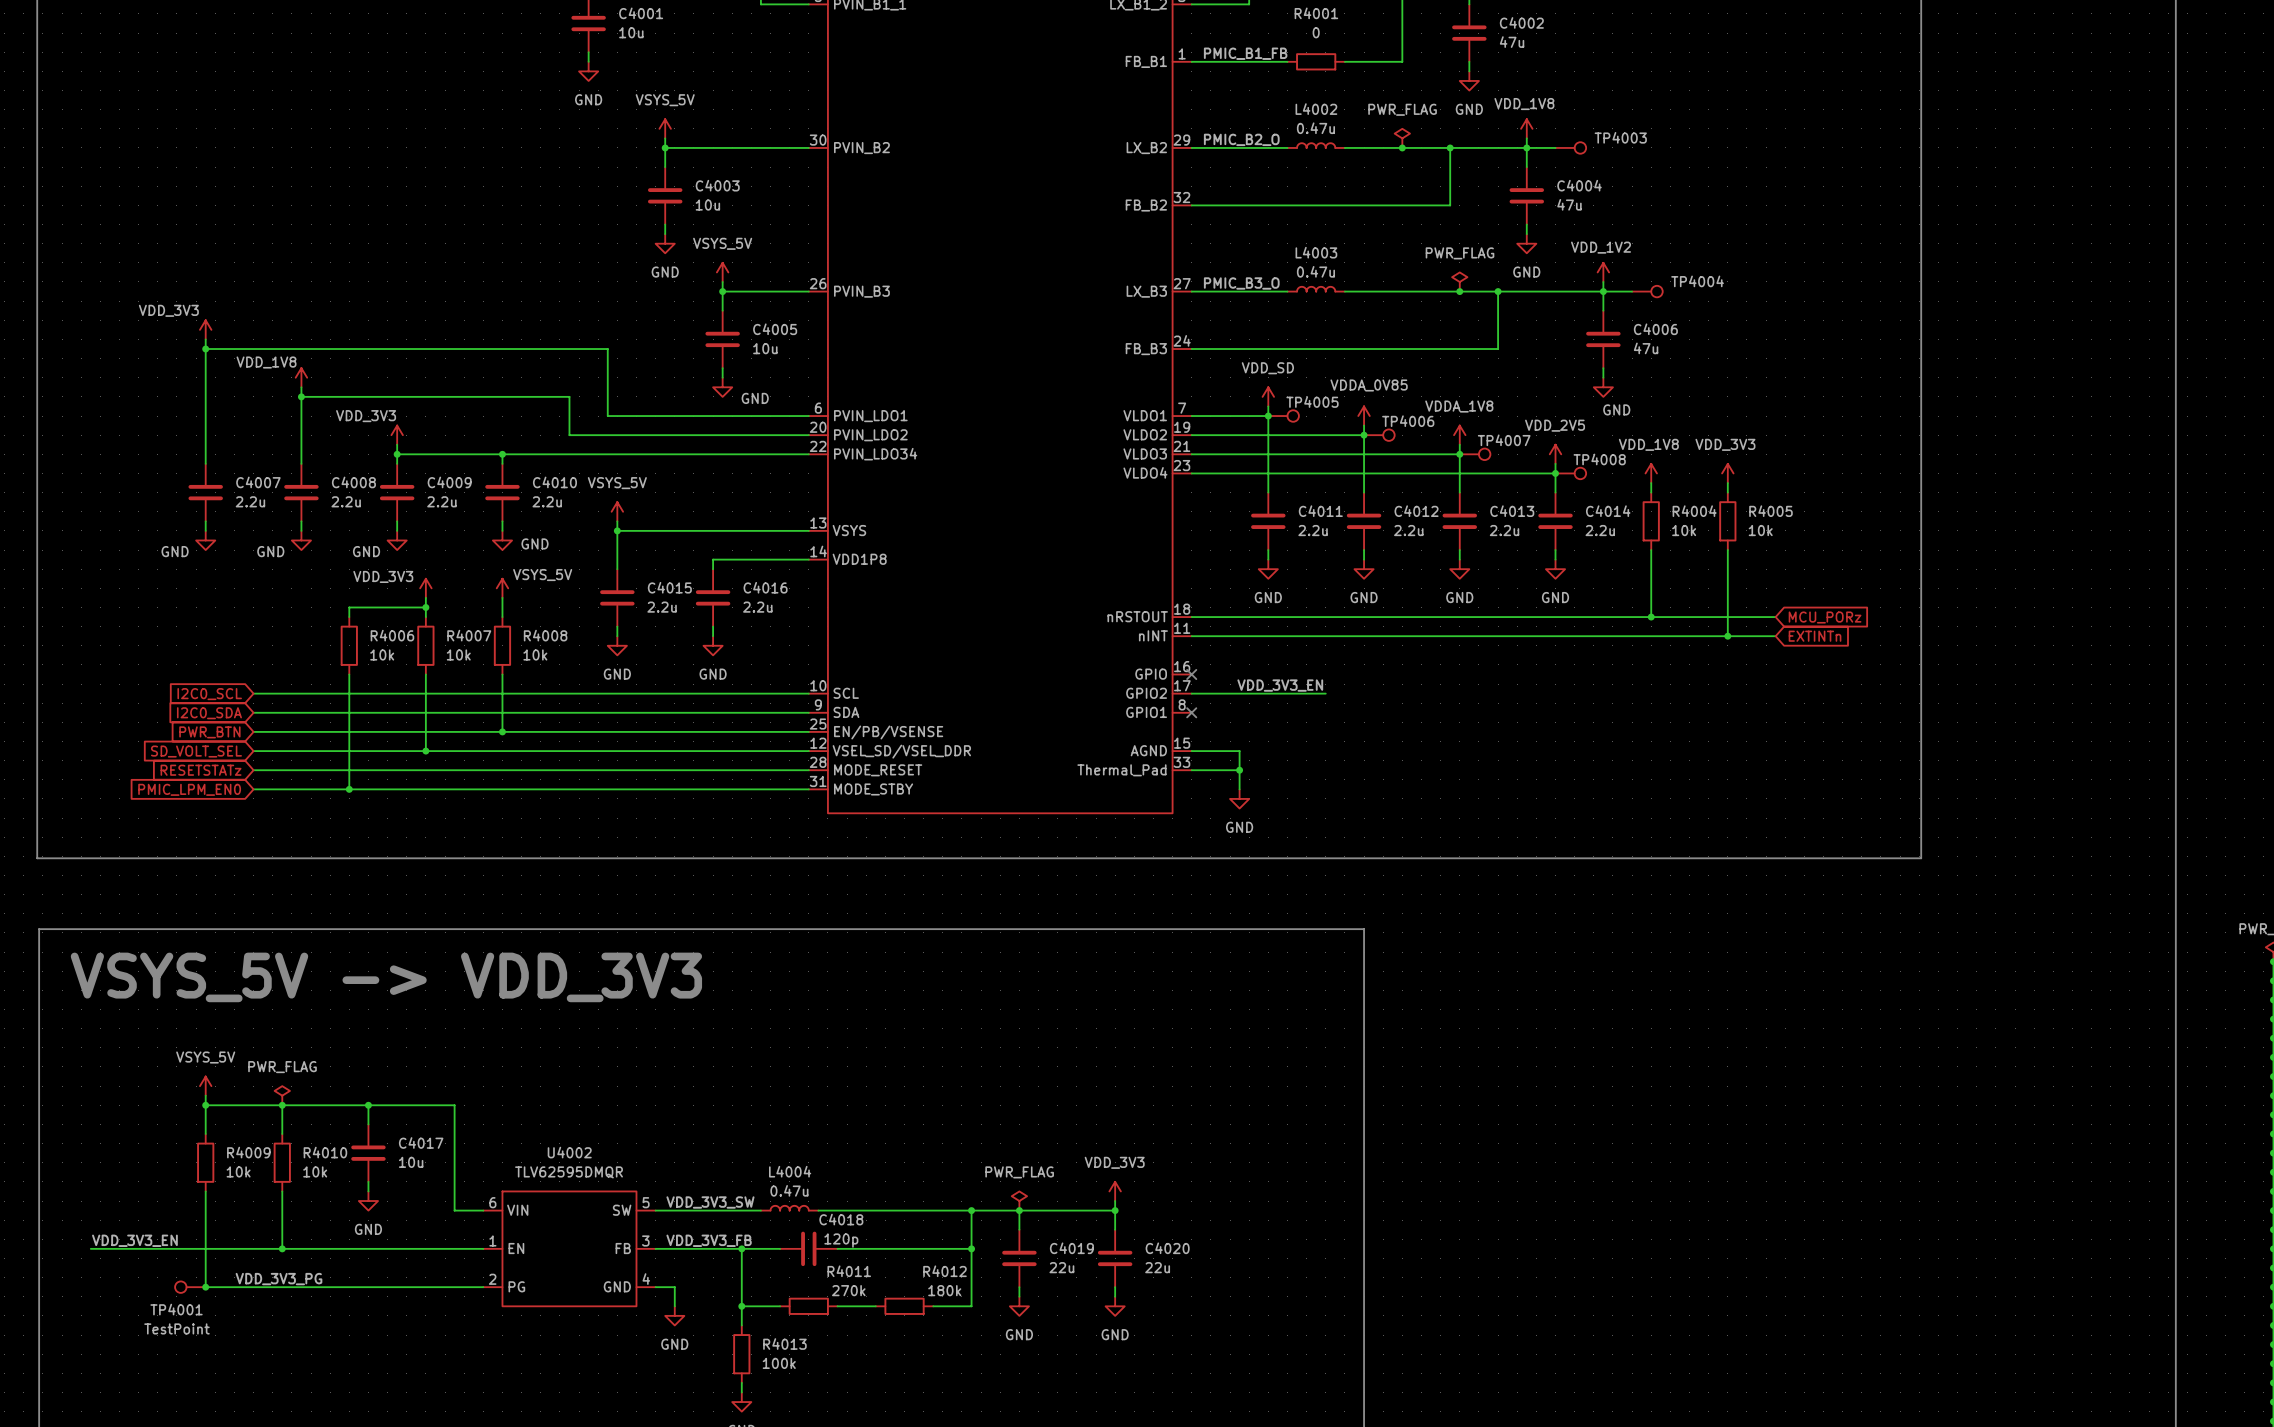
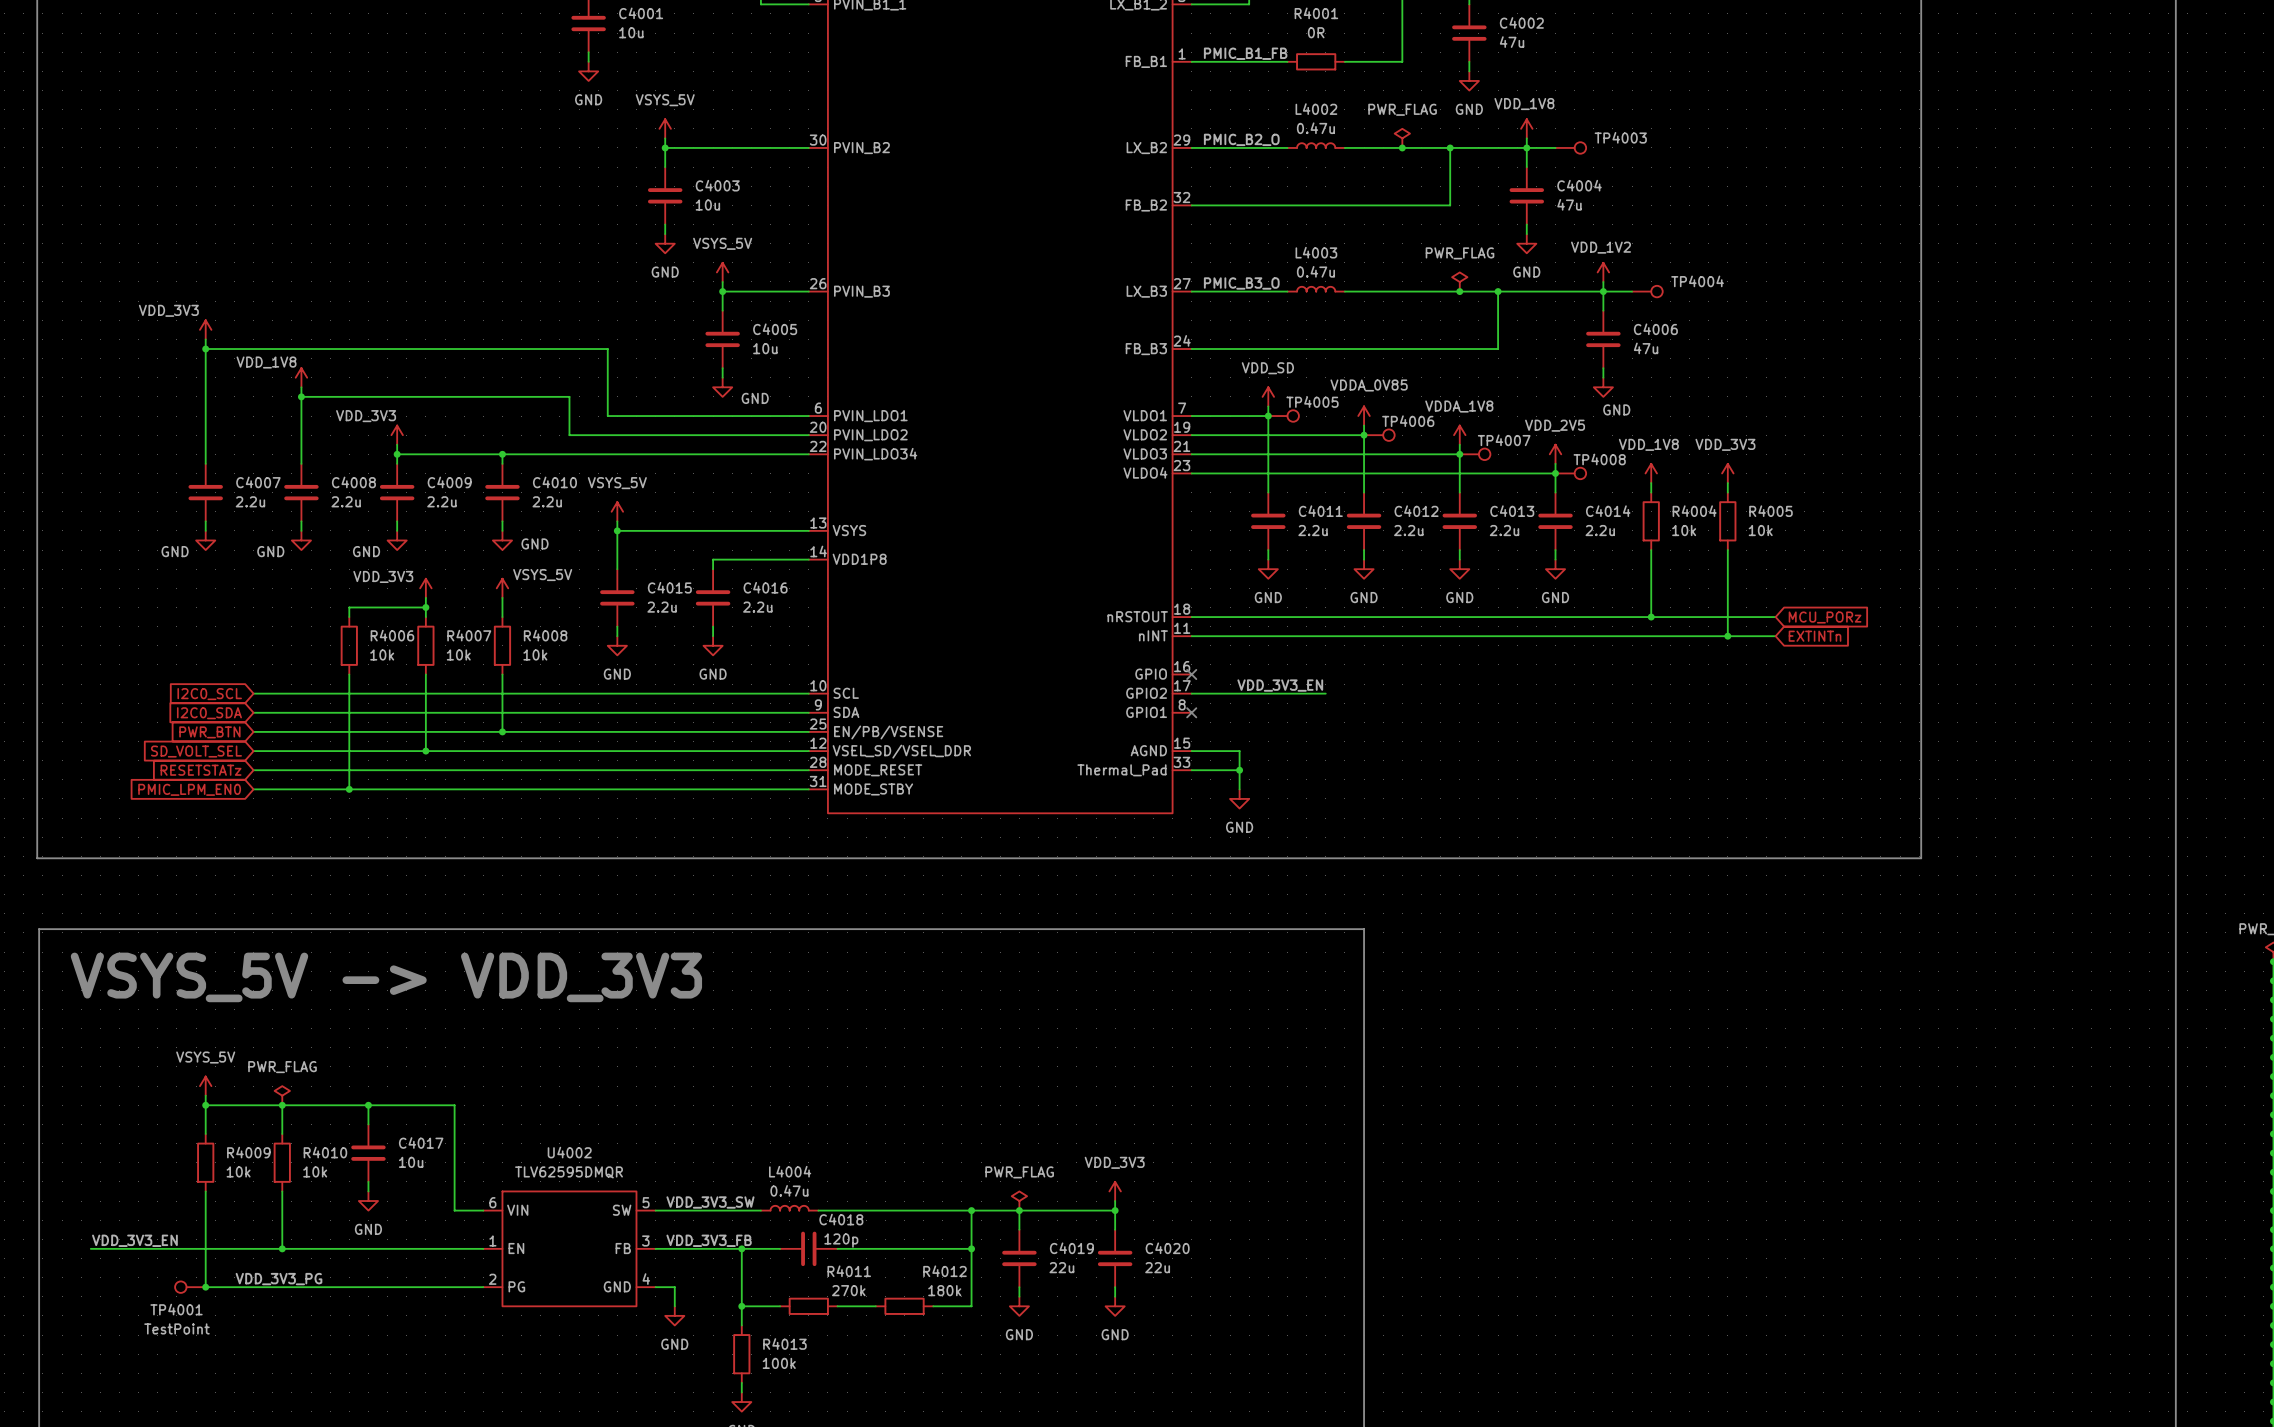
R4001 value: 0 (1316, 32) -> 0R (1316, 32)

